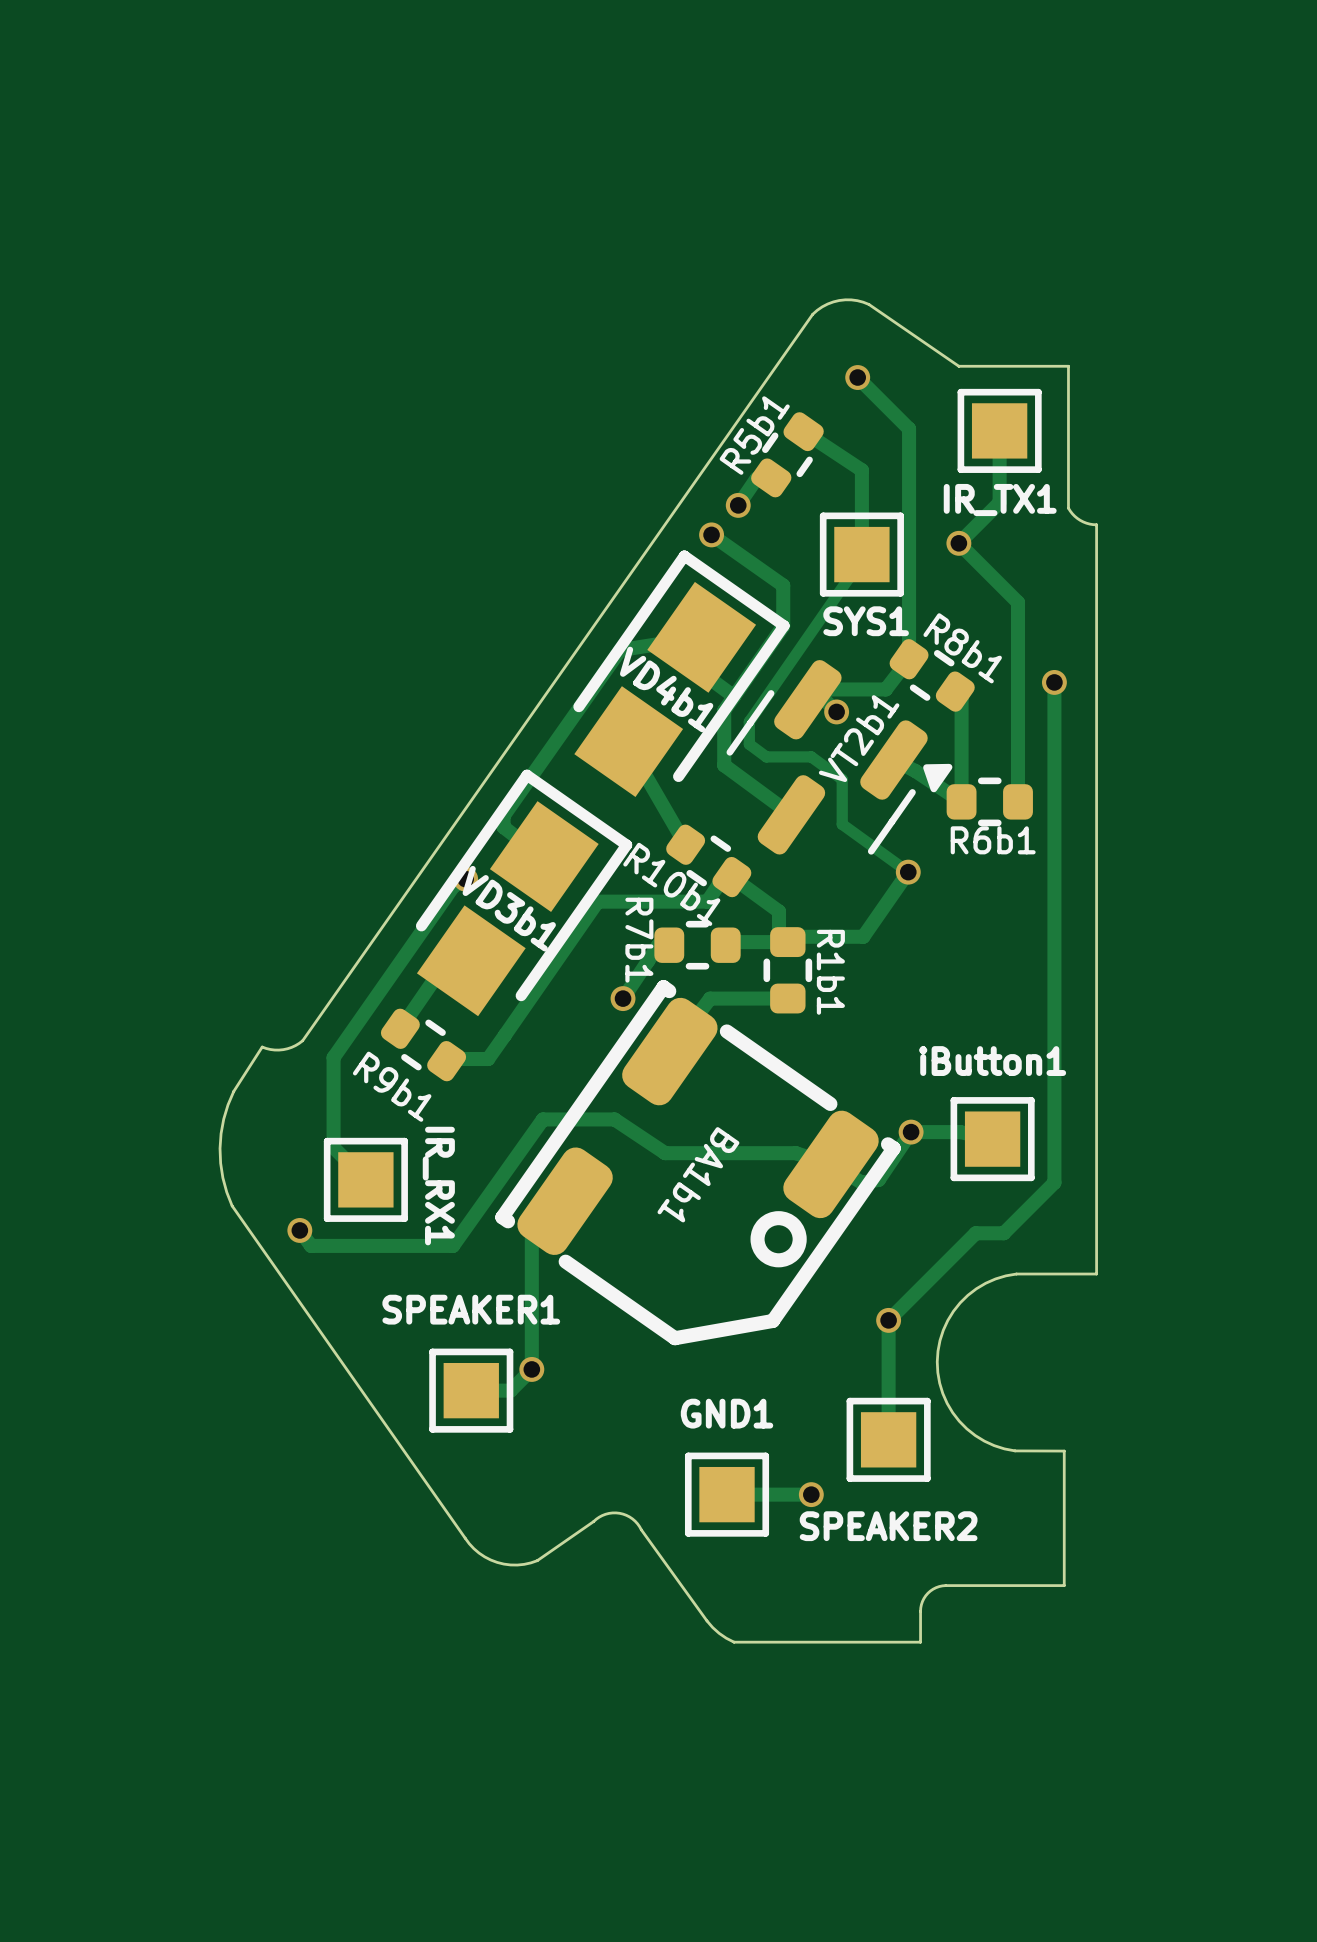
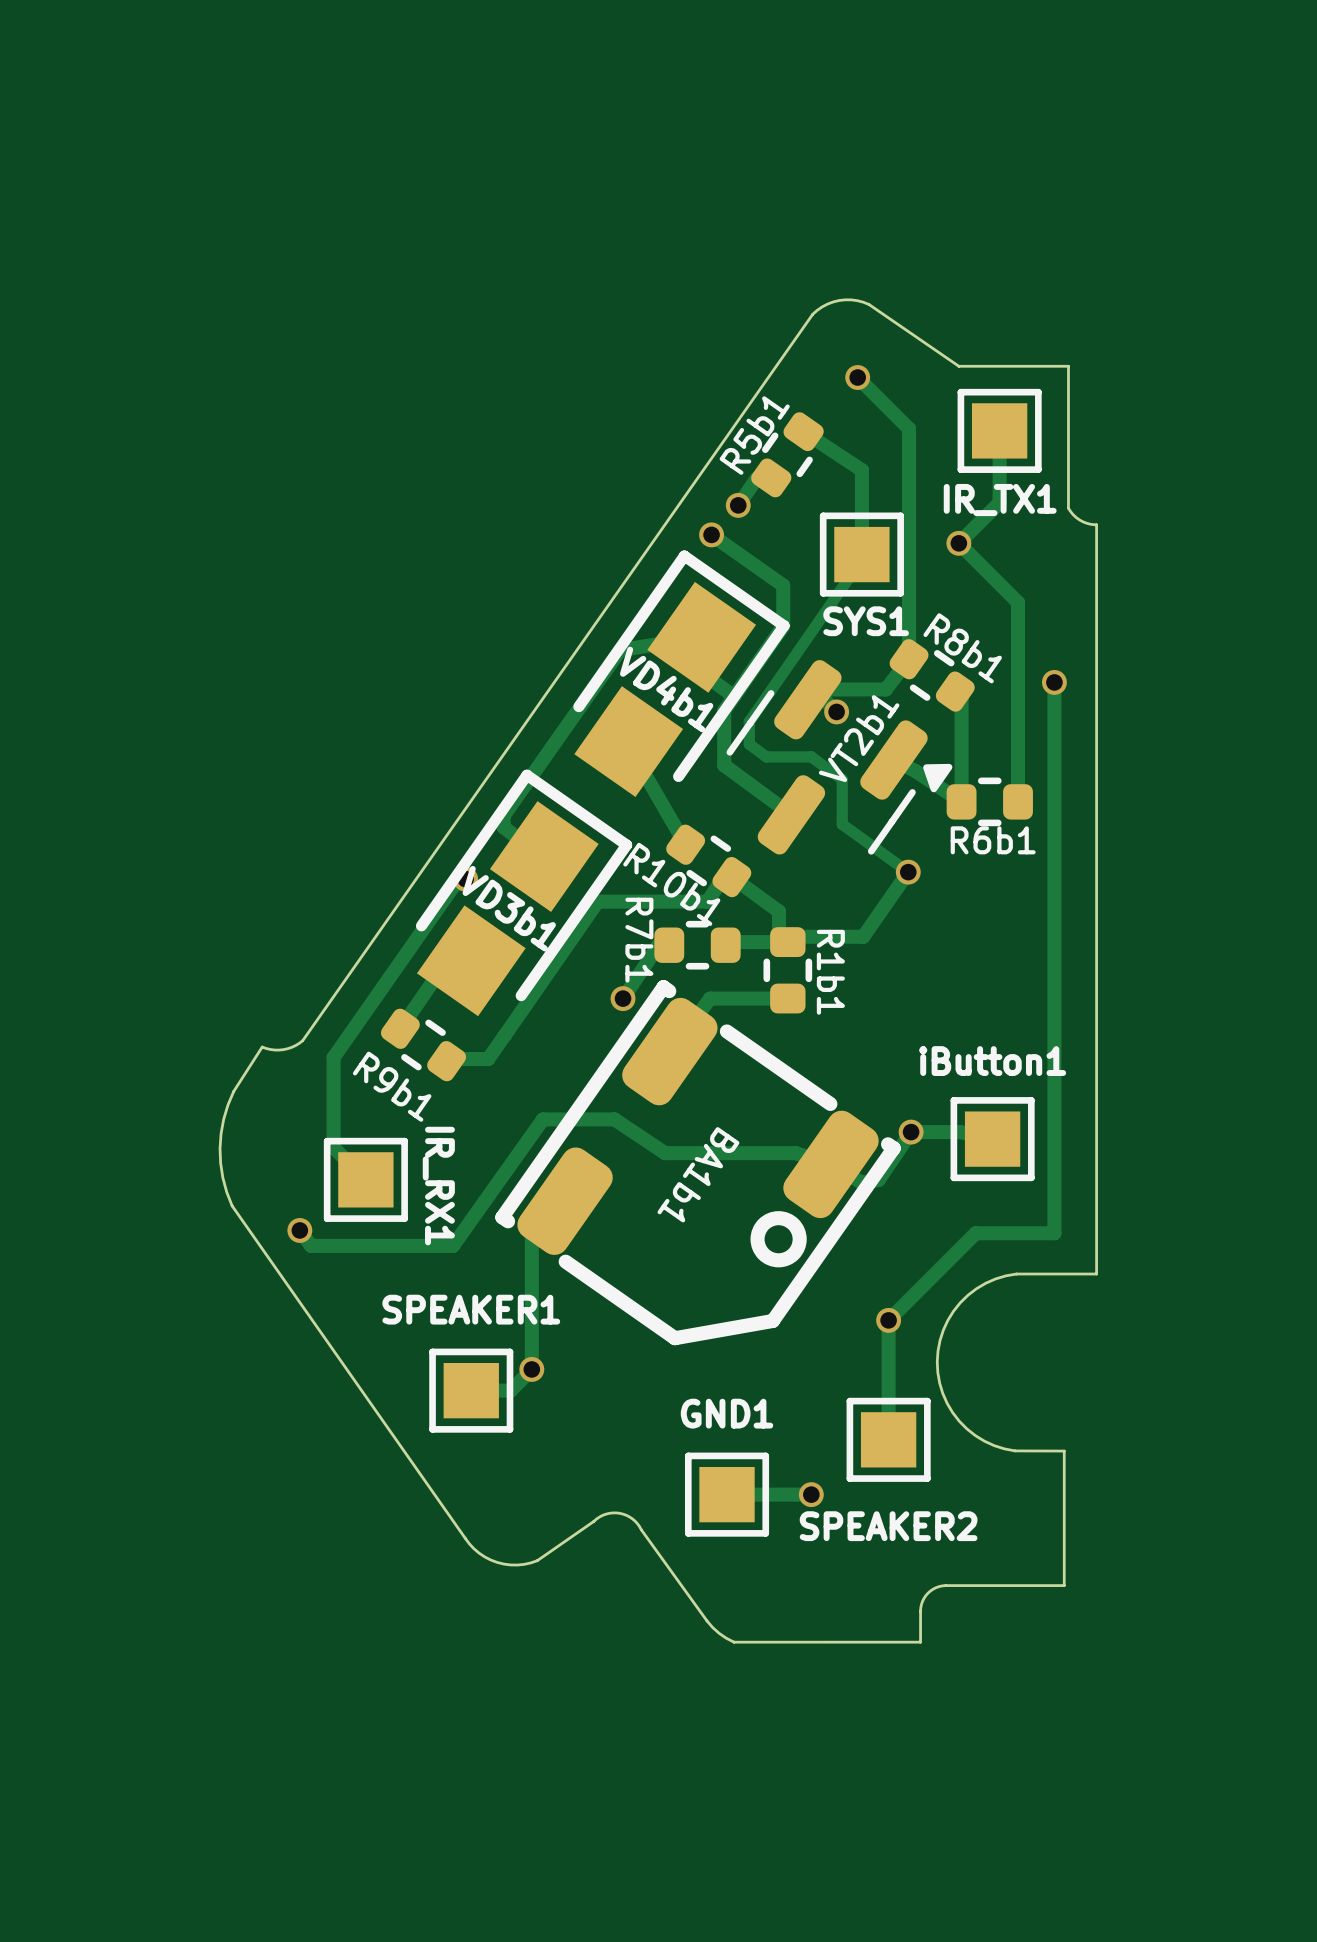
track: (1054, 1182) (1003, 1233) -> (1054, 1182) (1054, 1233) (1003, 1233)

